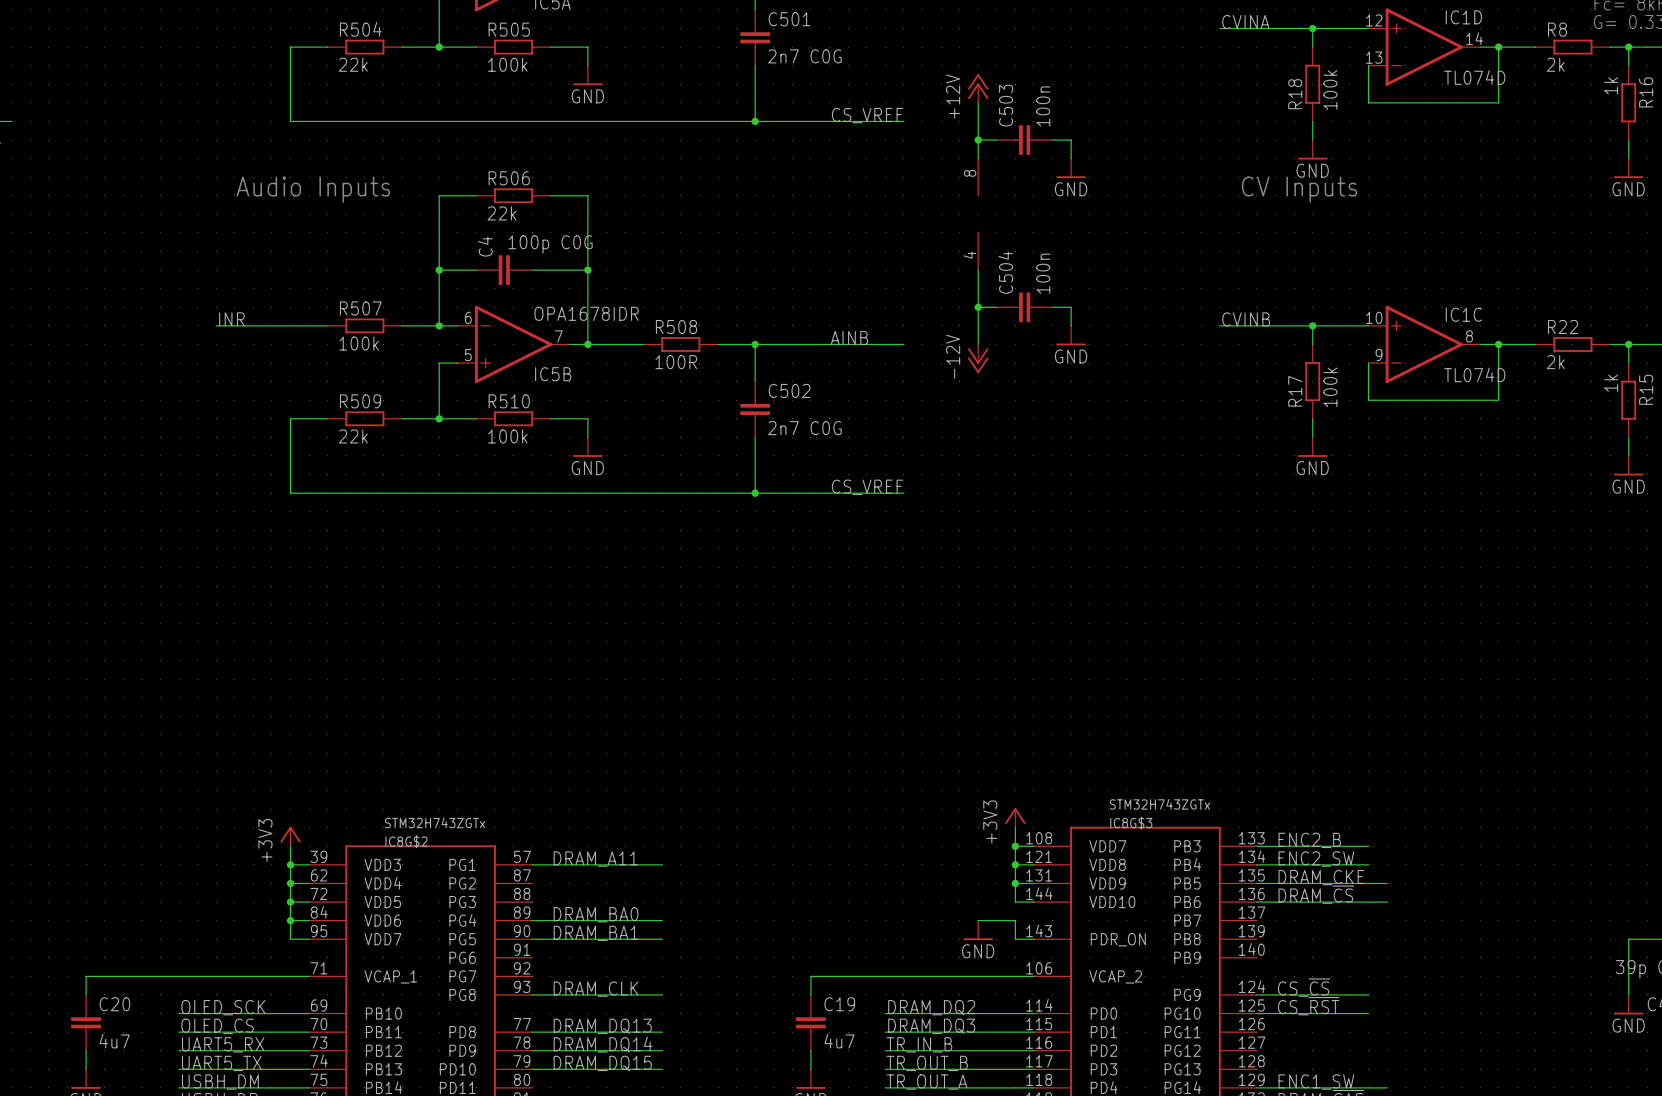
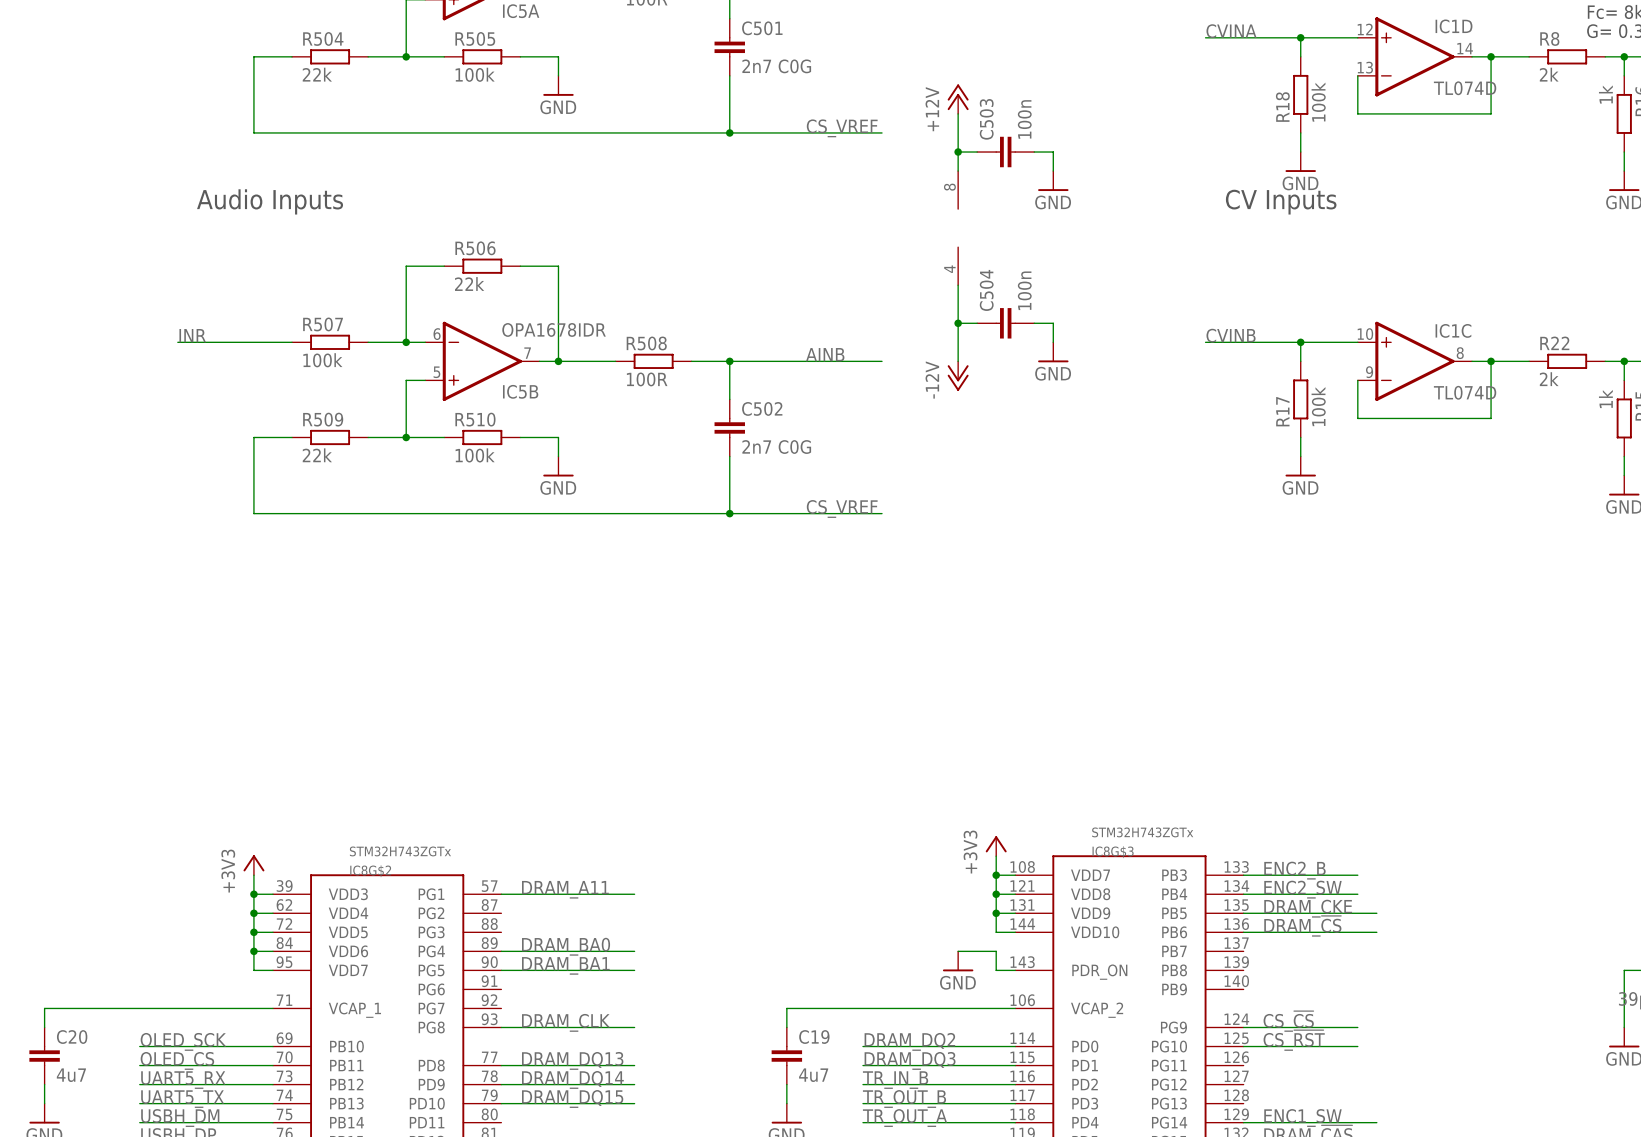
wire: (476, 195) (439, 195) (439, 251) -> (444, 266) (406, 266)
R506 position: (513, 195) -> (482, 266)
wire: (550, 195) (587, 195) (587, 251) -> (520, 266) (558, 266)
wire: (439, 270) (476, 270) -> none
junction: (439, 270) -> none
C4: 100p C0G (504, 270) -> none
wire: (532, 270) (587, 270) -> none
junction: (587, 270) -> none

